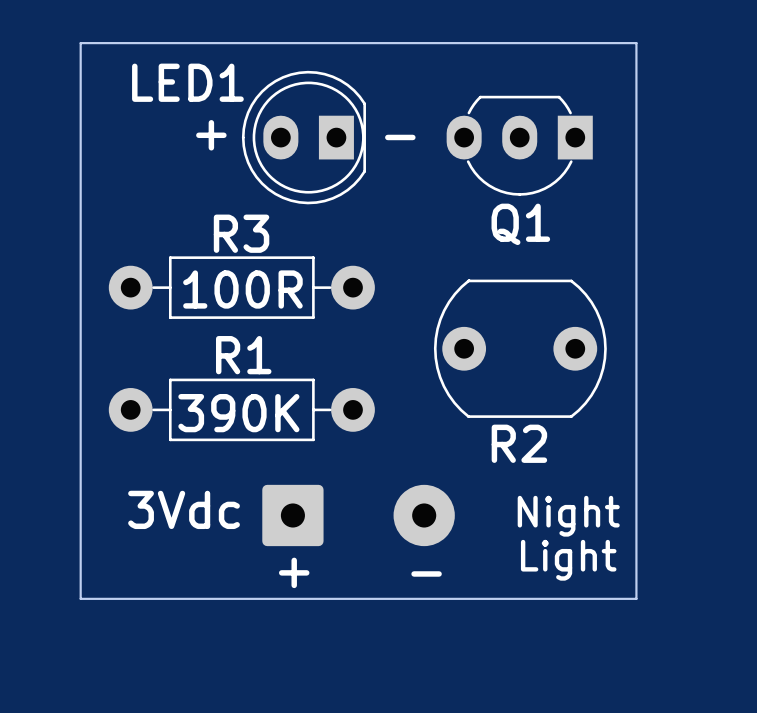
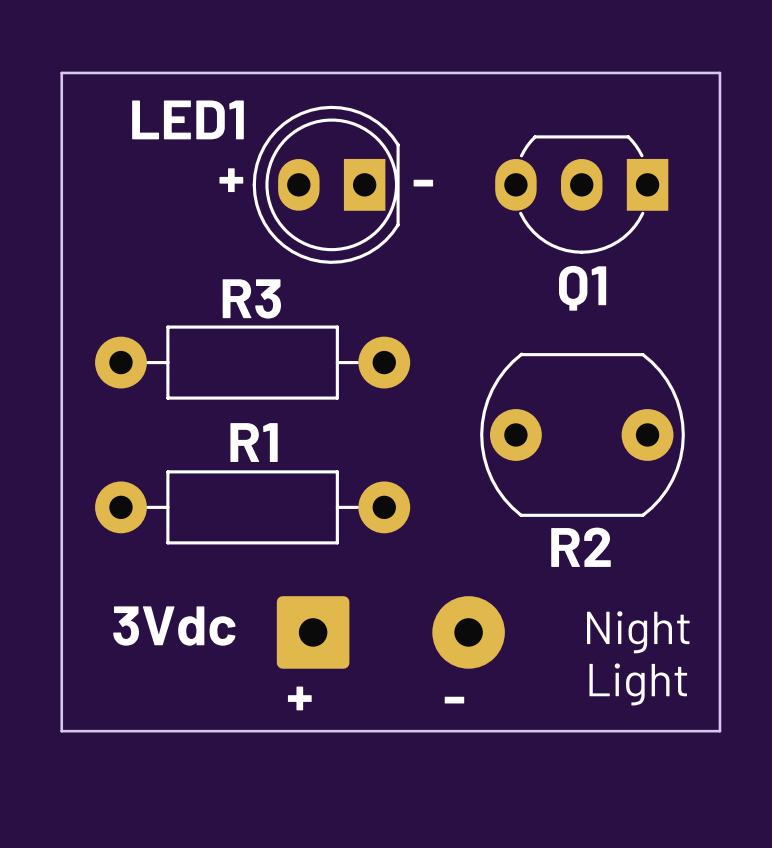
R3 value: 100R (242, 289) -> none
R1 value: 390K (238, 413) -> none

